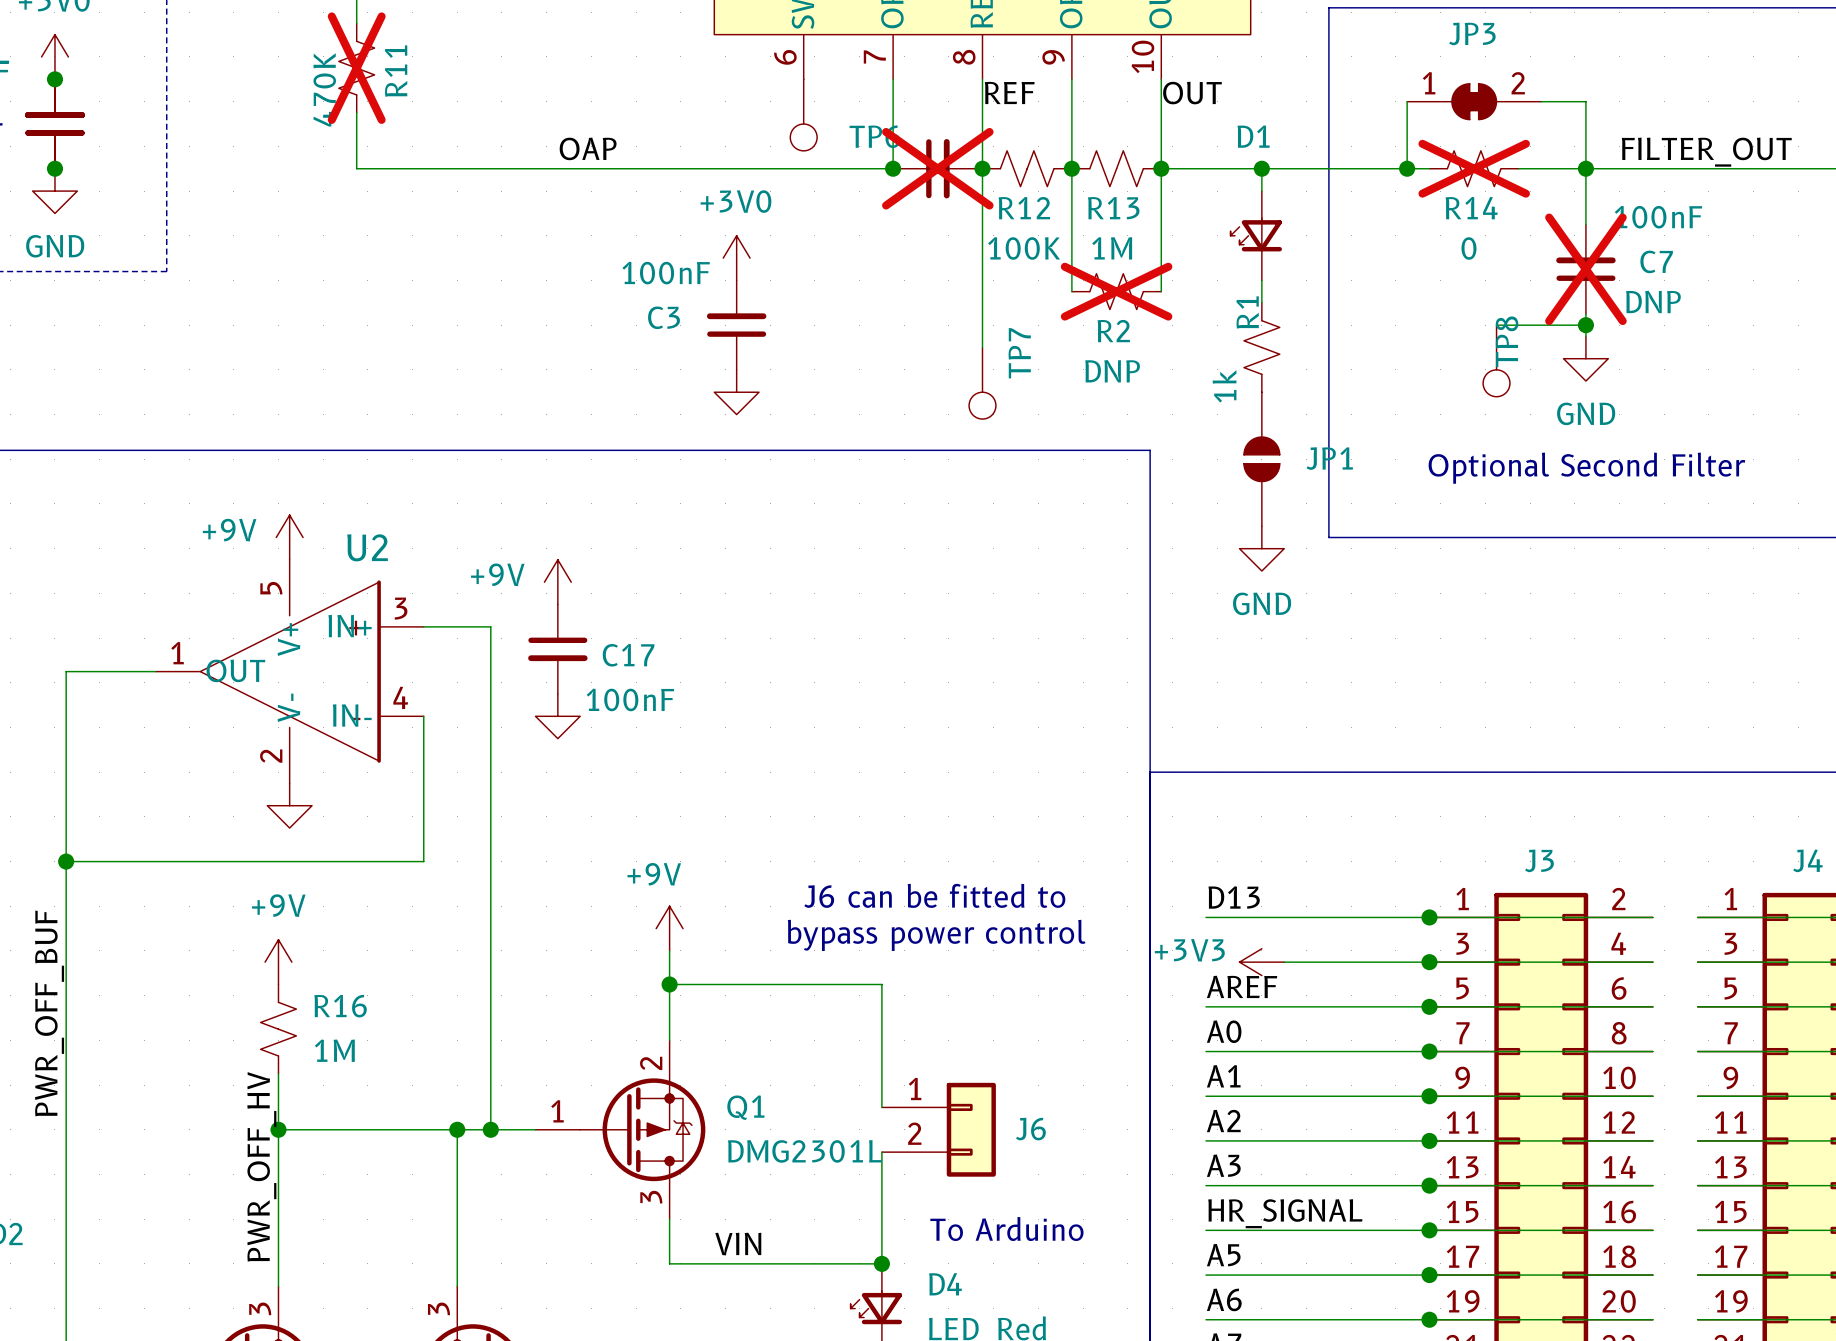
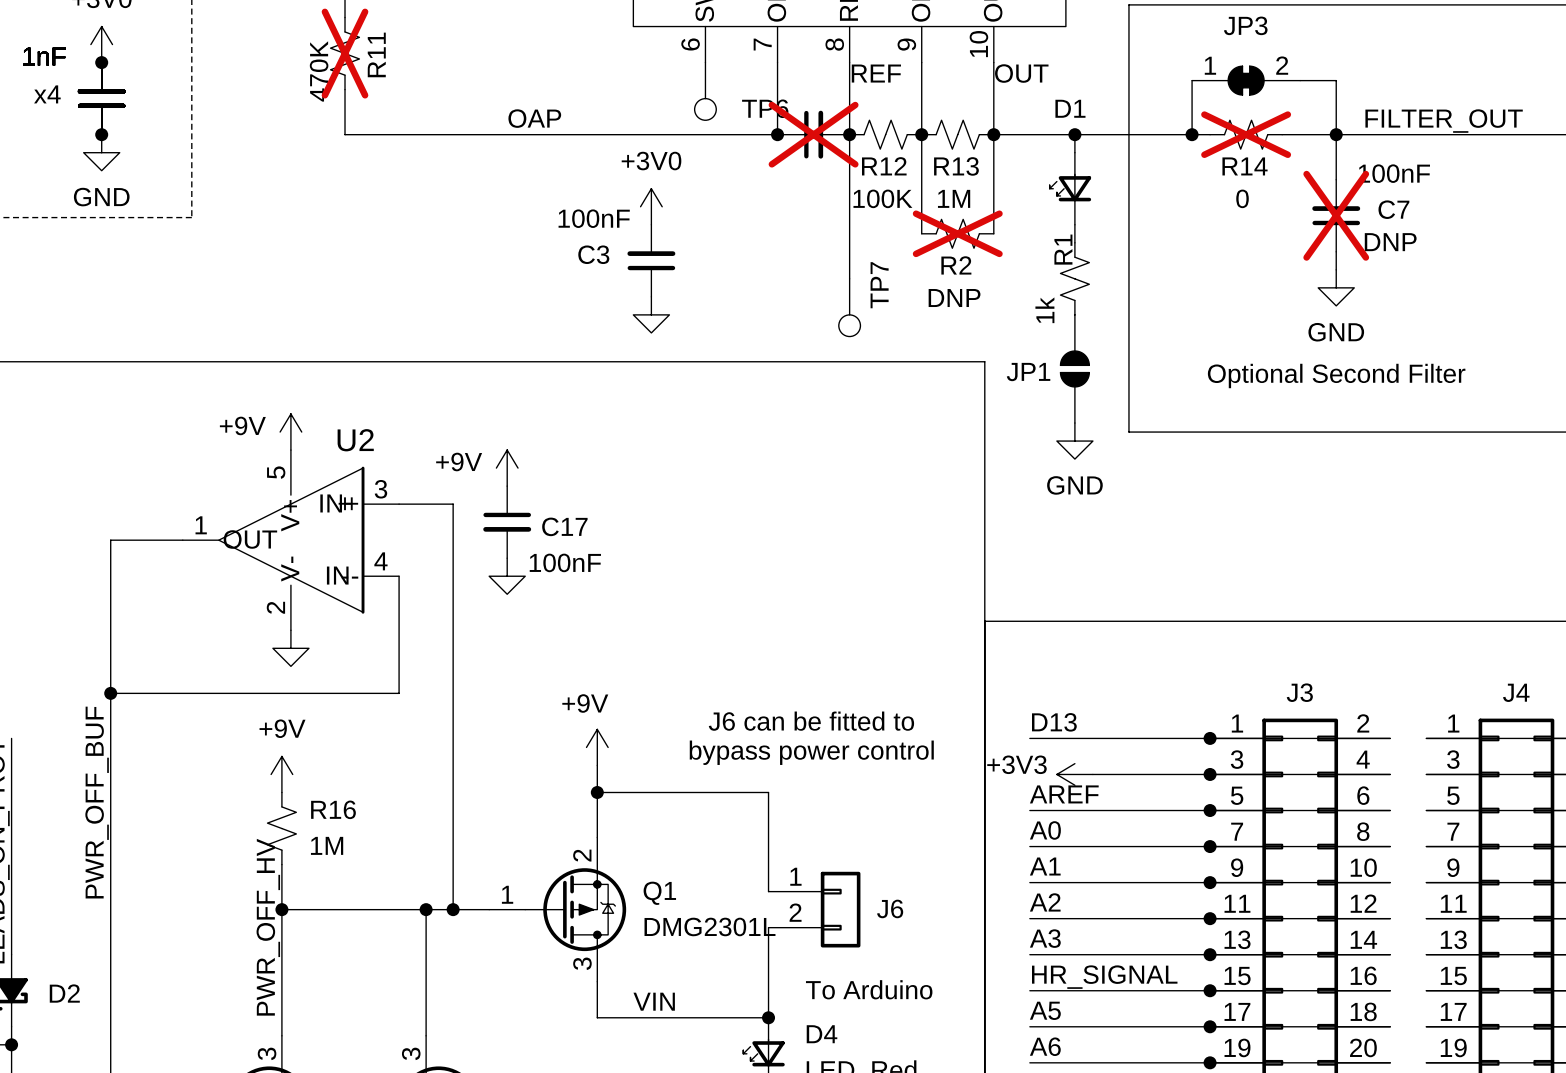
wire: (1496, 325) (1585, 325) -> none
junction: (1585, 325) -> none
TP8: (1496, 360) -> none
JP1 name position: JP1 (1329, 458) -> JP1 (1028, 372)

